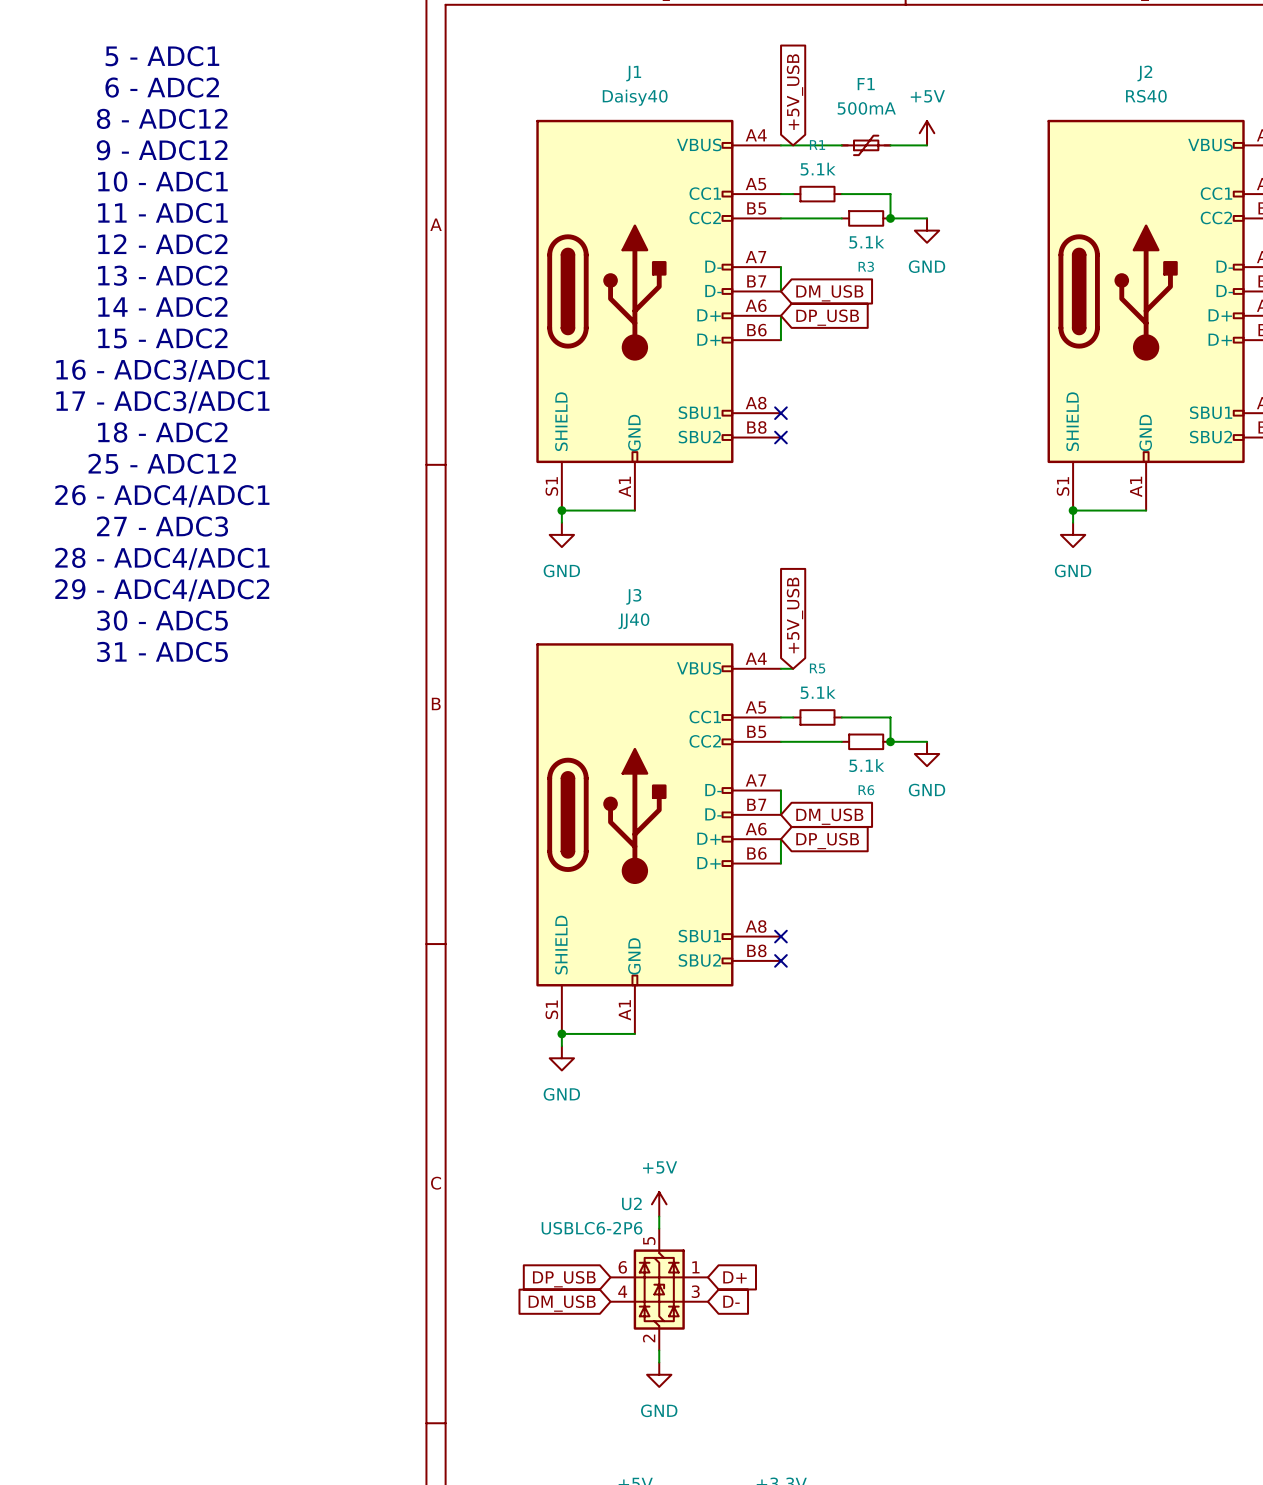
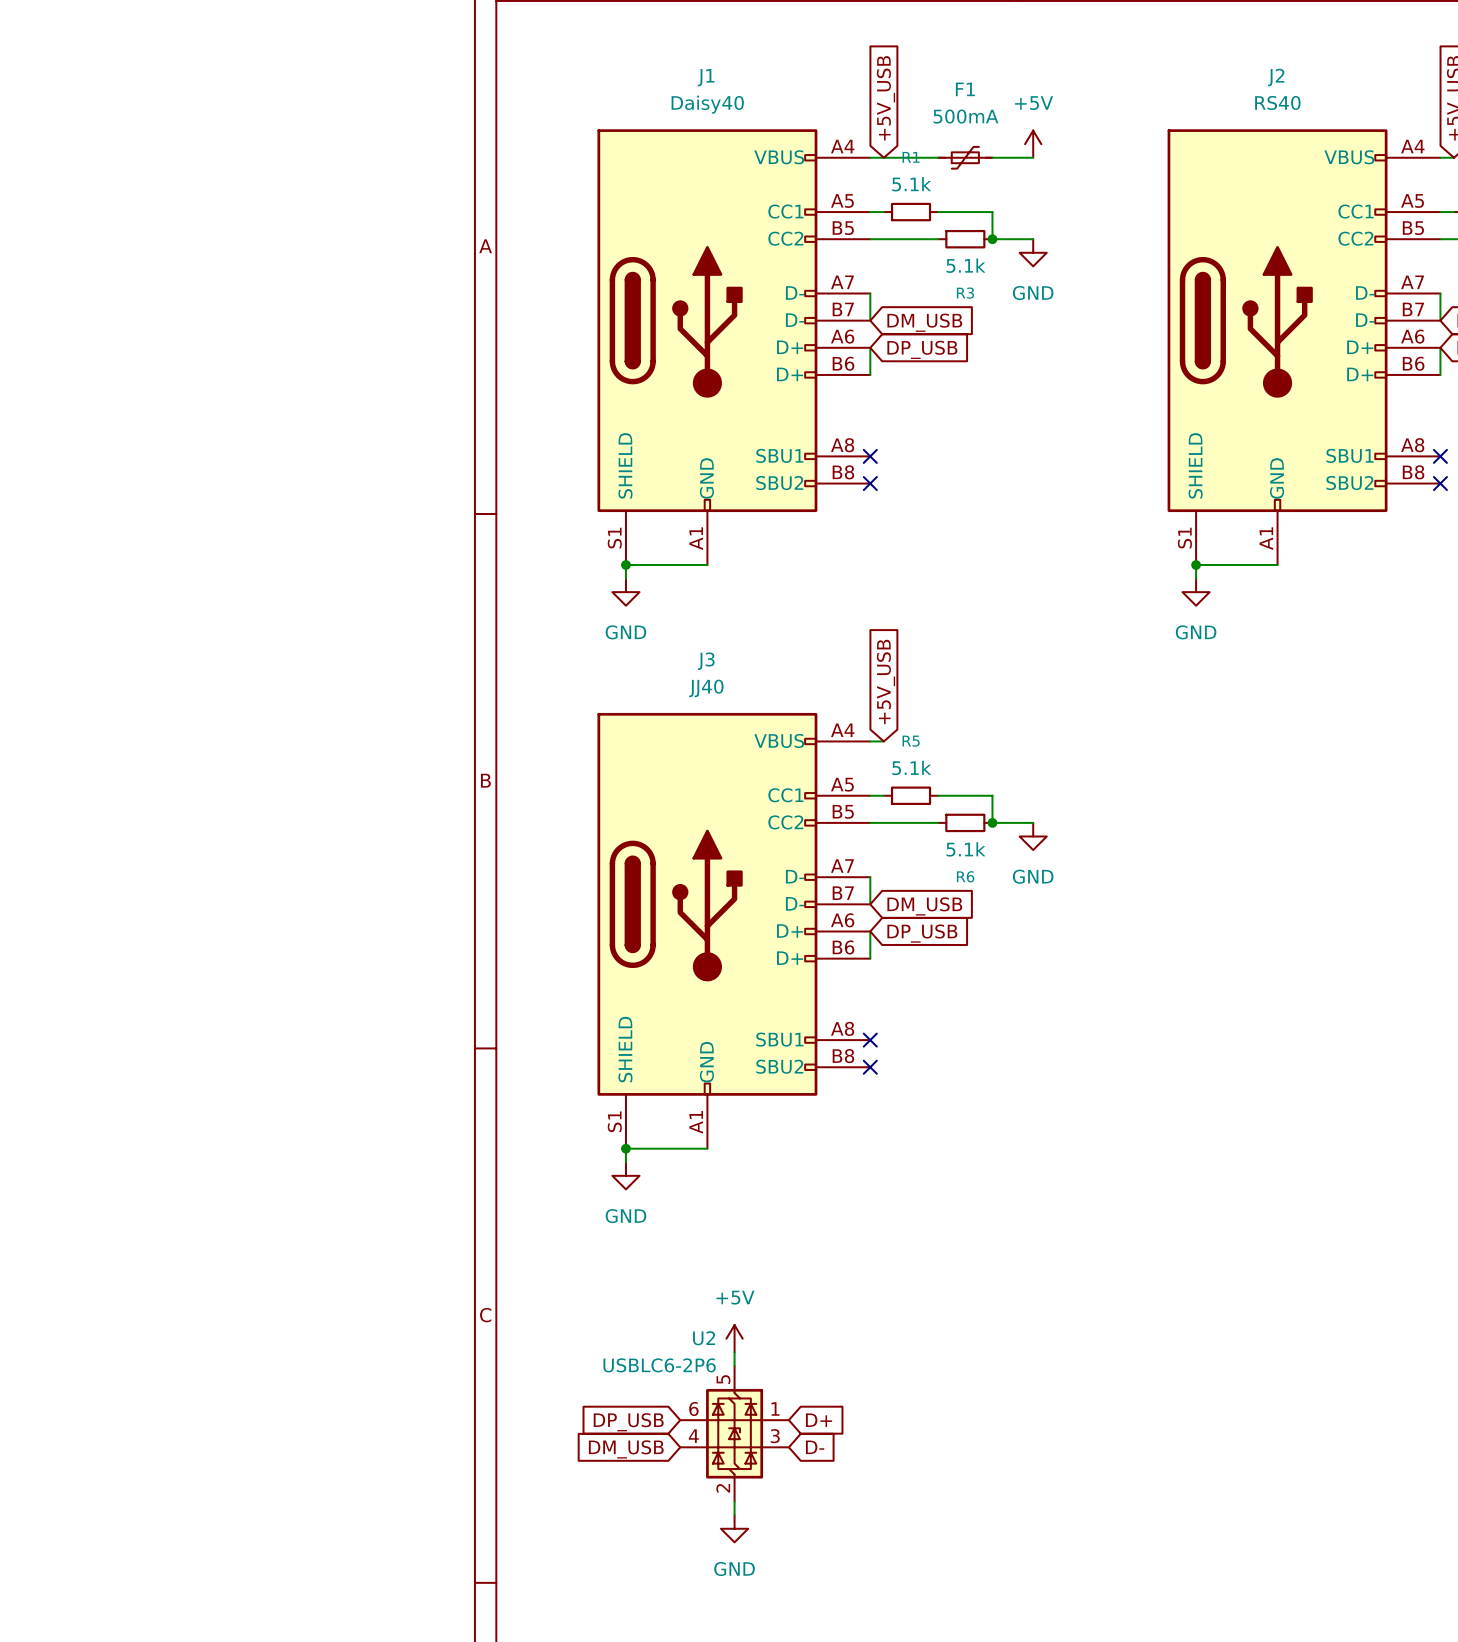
text: 5 - ADC1 (162, 56) -> none
text: 6 - ADC2 (162, 87) -> none
text: 8 - ADC12 (162, 118) -> none
text: 9 - ADC12 (162, 150) -> none
text: 10 - ADC1 (162, 181) -> none
text: 11 - ADC1 (162, 212) -> none
text: 12 - ADC2 (162, 244) -> none
text: 13 - ADC2 (162, 275) -> none
text: 14 - ADC2 (162, 307) -> none
text: 15 - ADC2 (162, 338) -> none
text: 16 - ADC3/ADC1 (162, 370) -> none
text: 17 - ADC3/ADC1 (162, 402) -> none
text: 18 - ADC2 (162, 432) -> none
text: 25 - ADC12 (162, 463) -> none
text: 26 - ADC4/ADC1 (162, 496) -> none
text: 27 - ADC3 (162, 526) -> none
text: 28 - ADC4/ADC1 (162, 558) -> none
text: 29 - ADC4/ADC2 (162, 590) -> none
text: 30 - ADC5 (162, 620) -> none
text: 31 - ADC5 (162, 651) -> none

